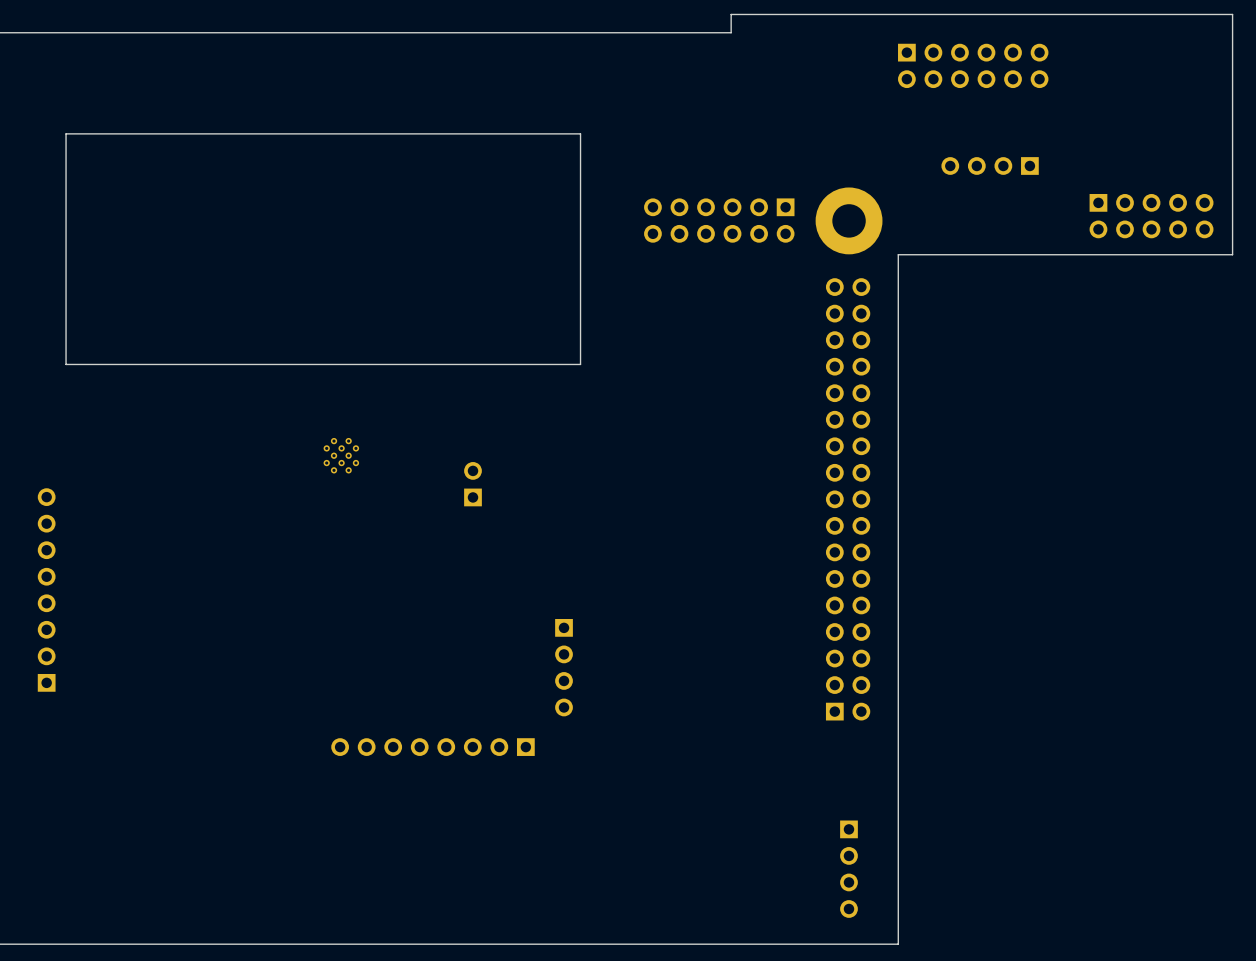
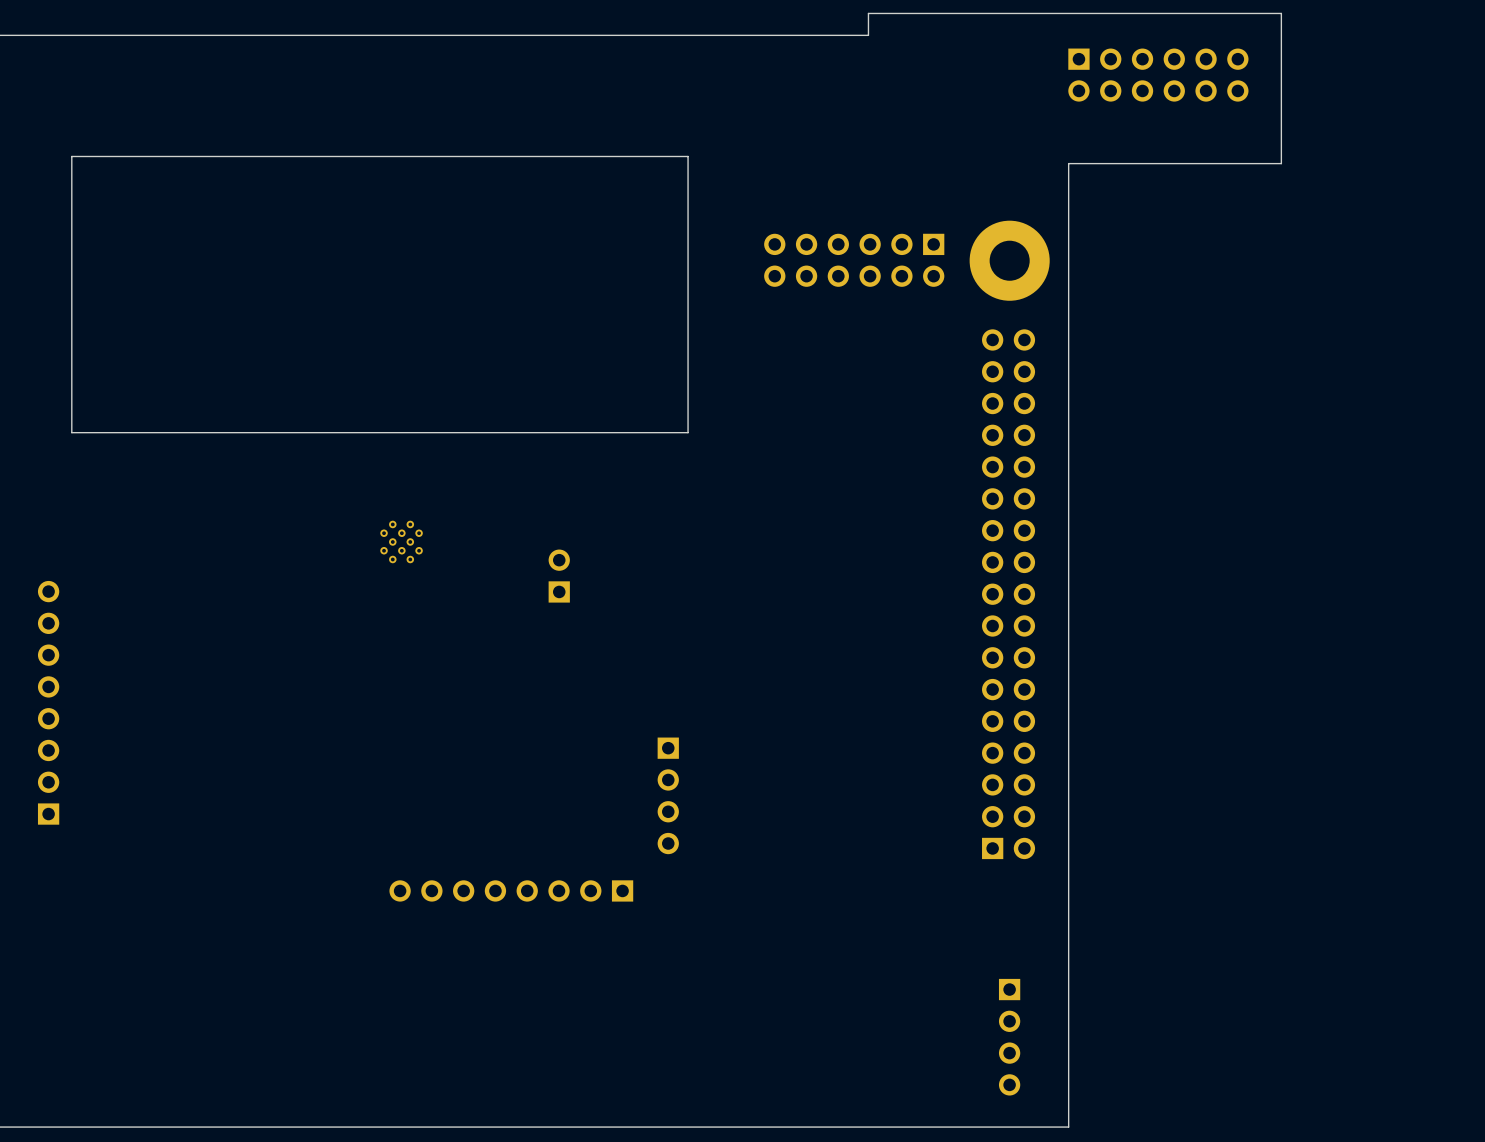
board edge: (1075, 14) (1232, 14) (1232, 254) (898, 254) -> (1281, 13) (1281, 163) (1068, 163) (1068, 301)
part: (990, 165) -> none
part: (1151, 216) -> none

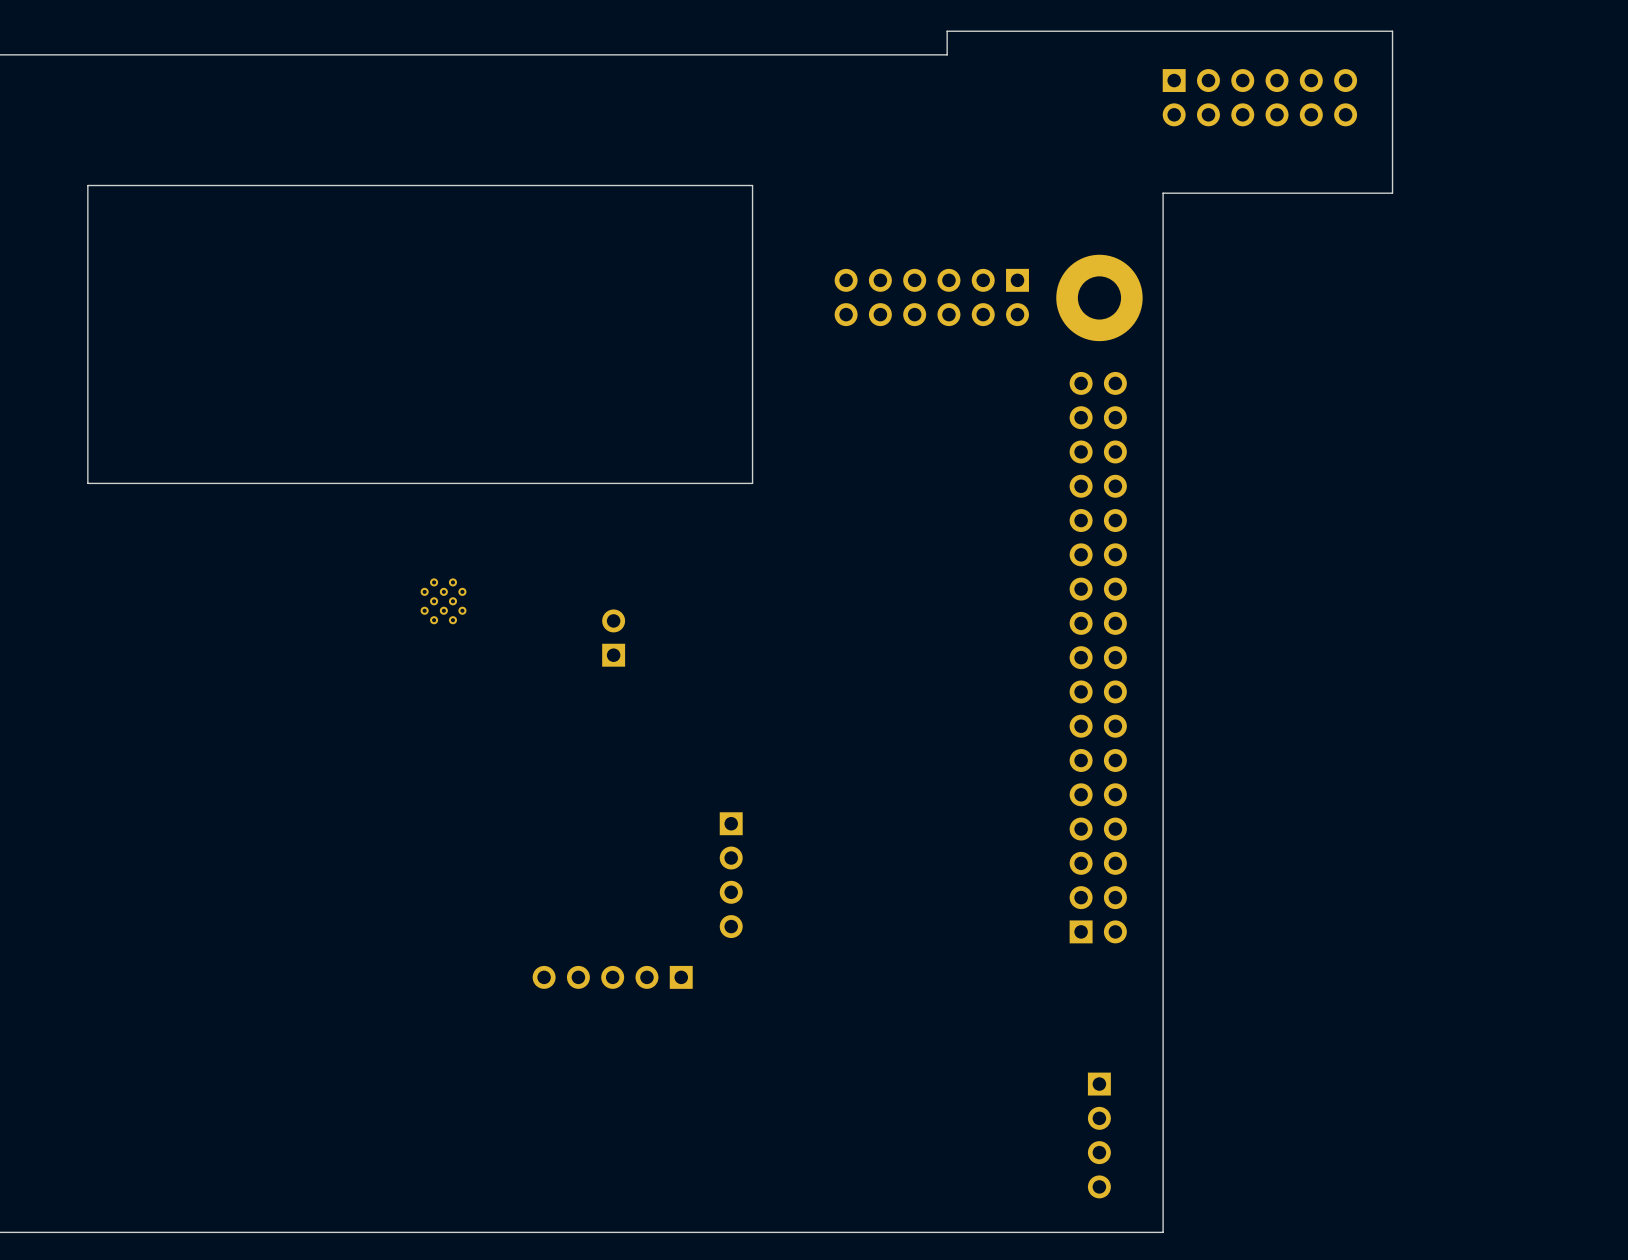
part: (48, 702) -> none
part: (511, 890) -> none
part: none -> (612, 977)

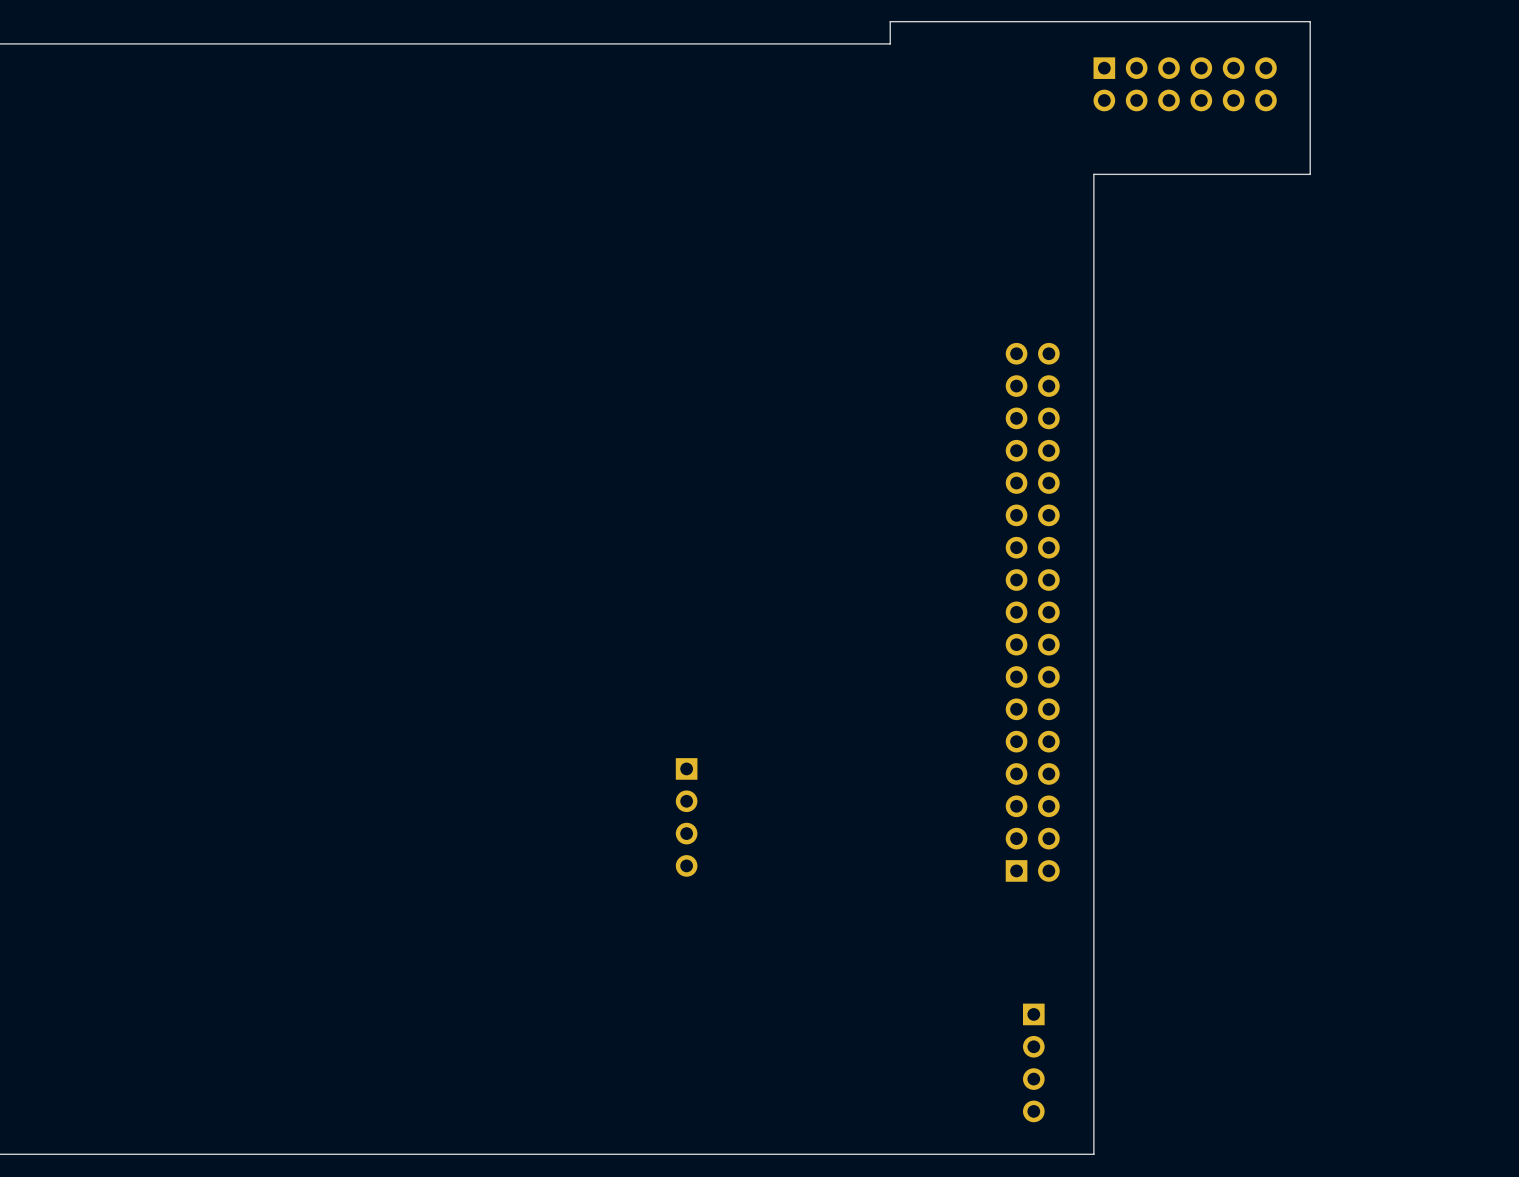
board edge: (752, 185) (87, 185) (87, 483) (752, 483) (752, 185) -> none
part: (931, 297) -> none
part: (1099, 297) -> none
part: (443, 601) -> none
part: (613, 638) -> none
part: (612, 977) -> none

